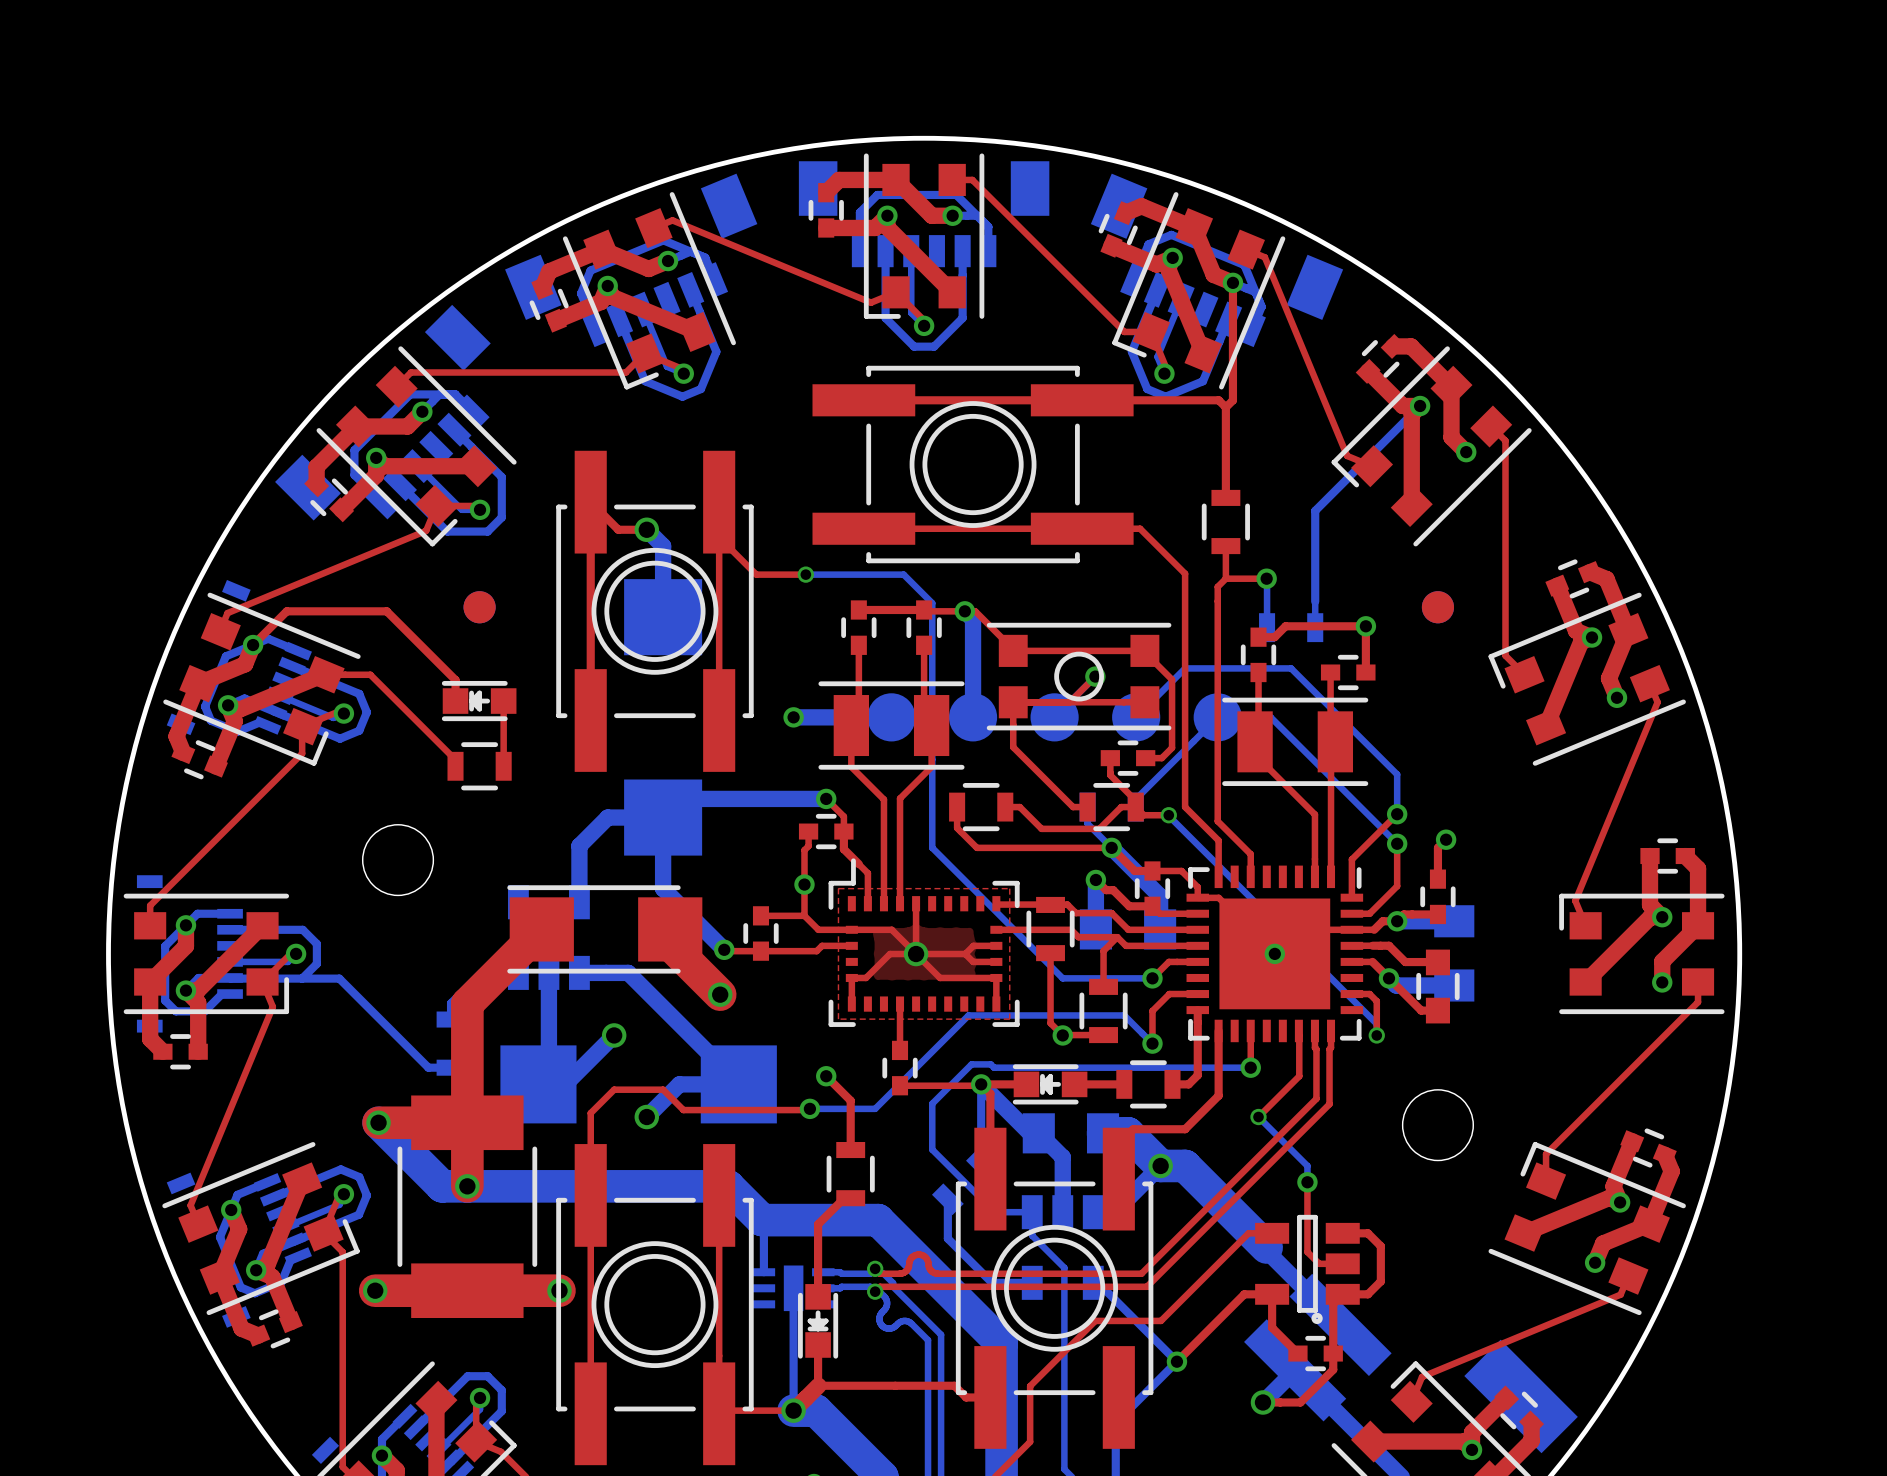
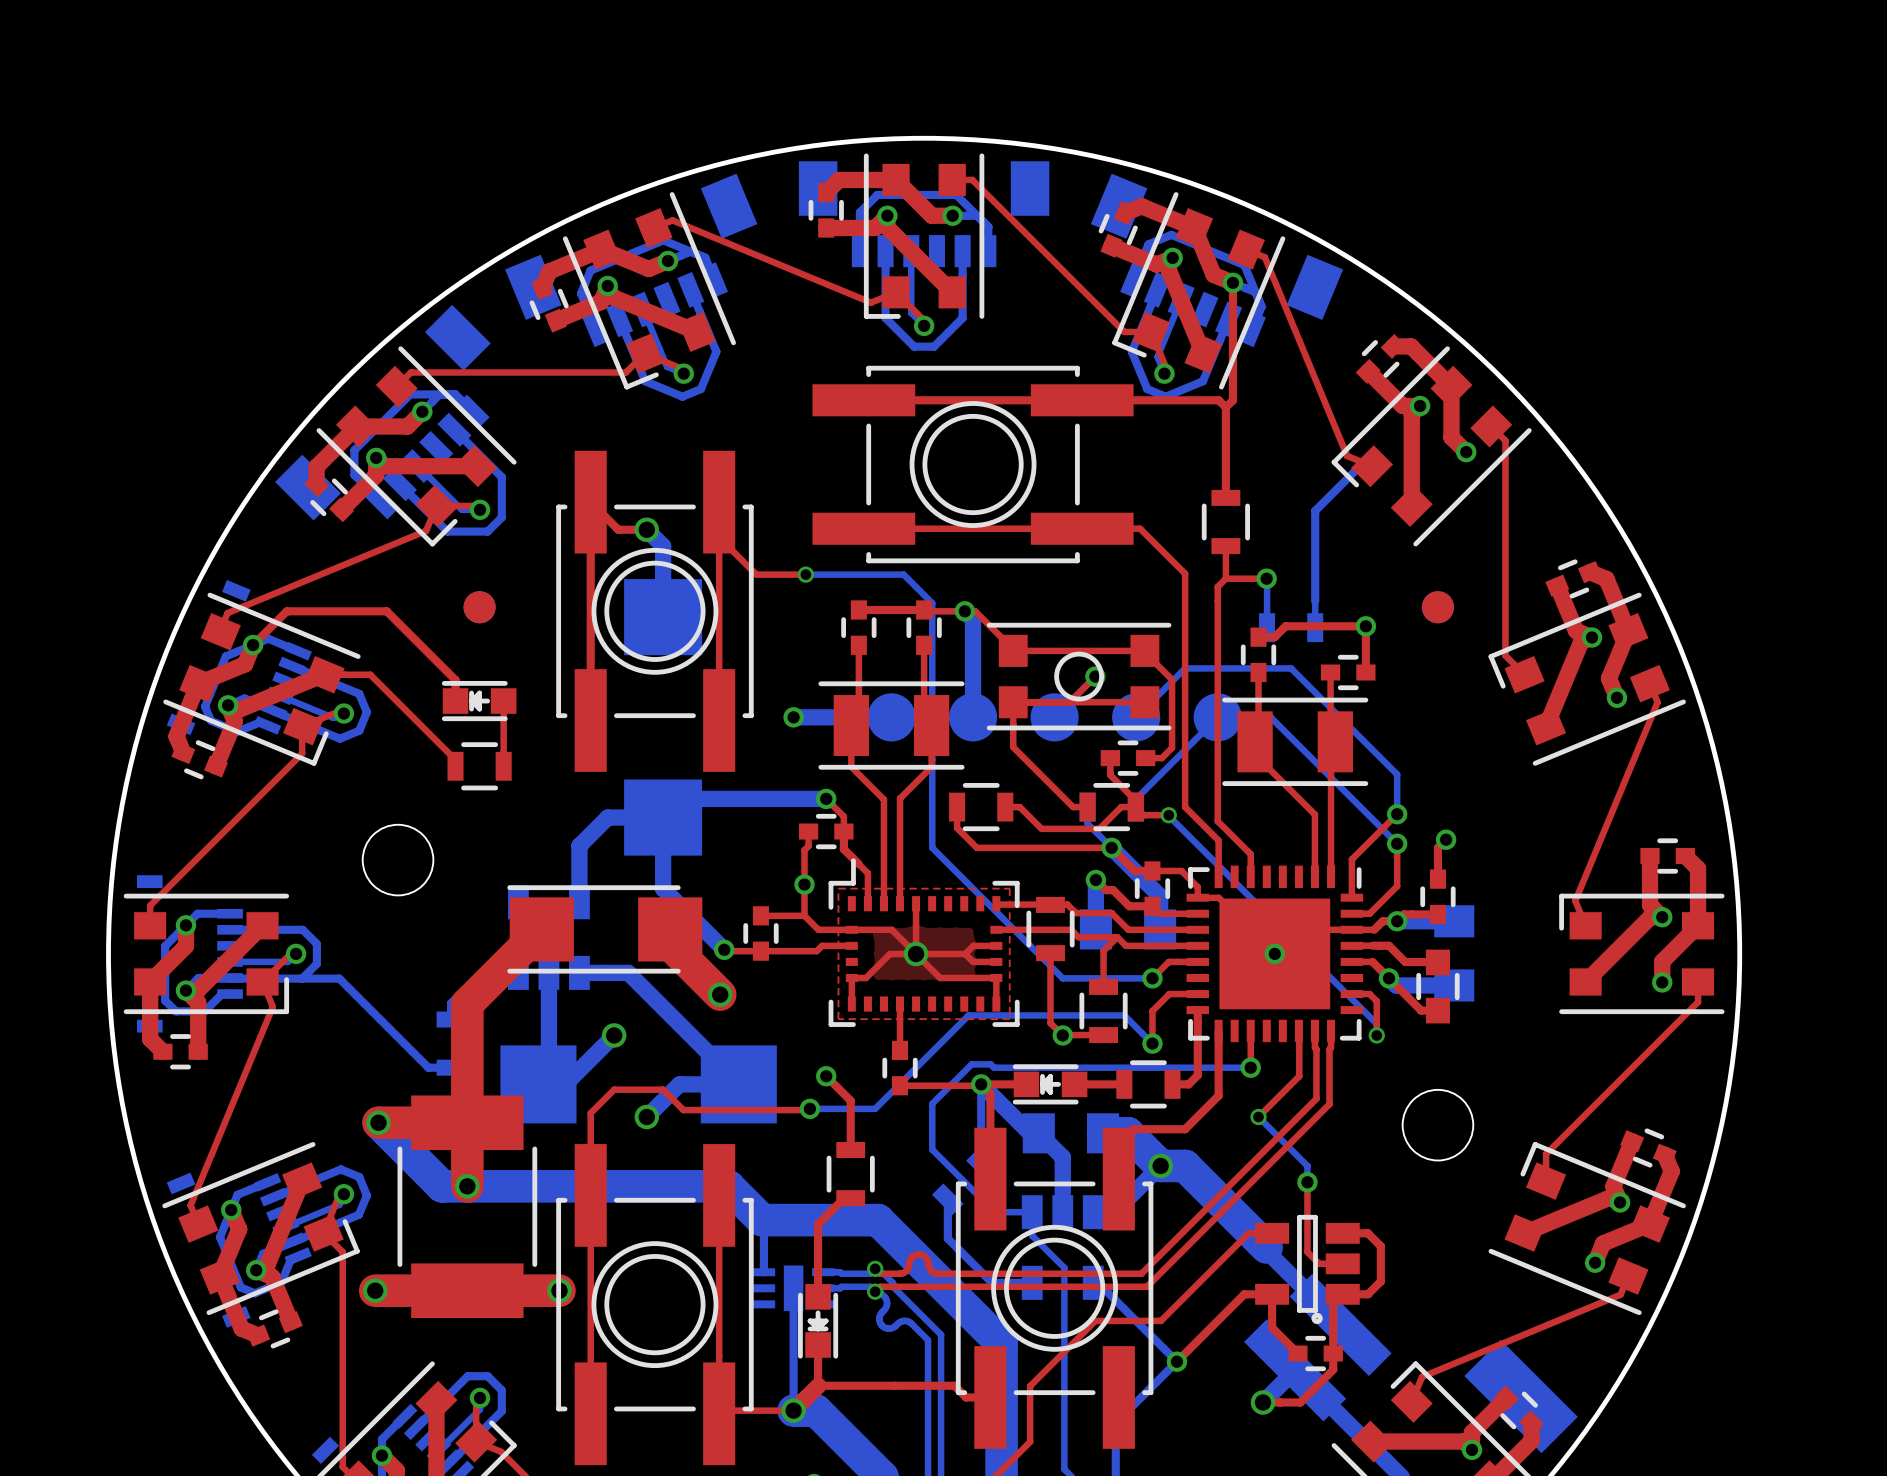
bottom track: (1420, 406) (1362, 463) -> none

